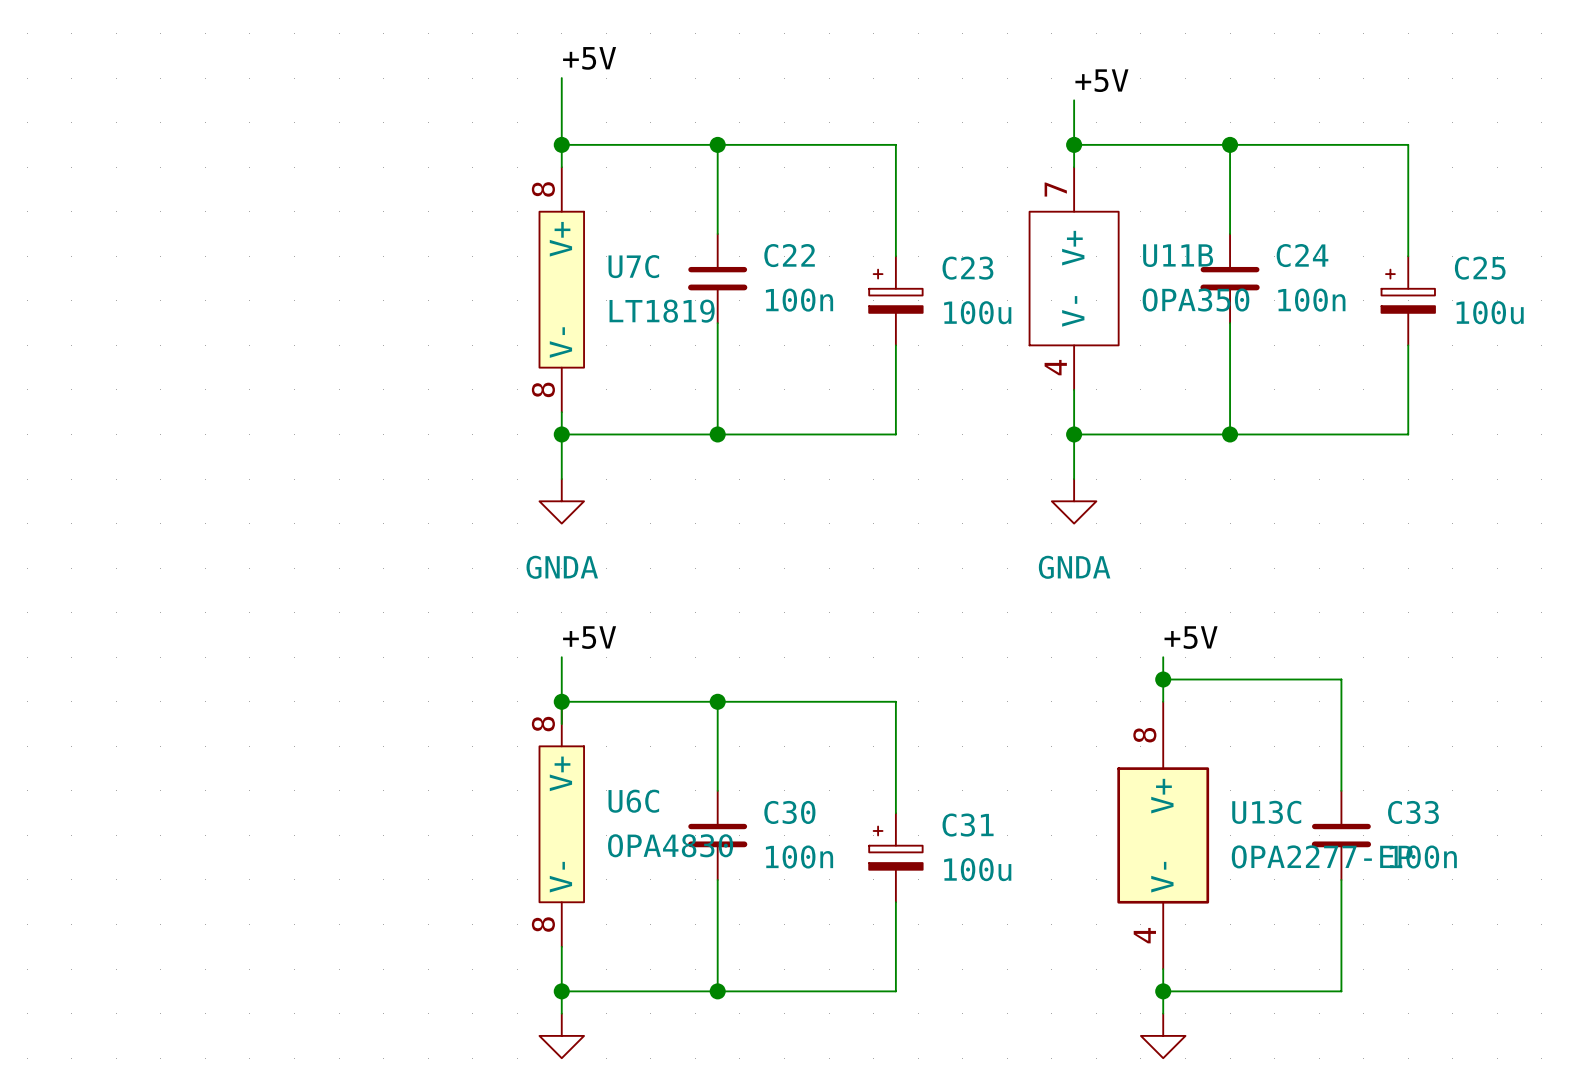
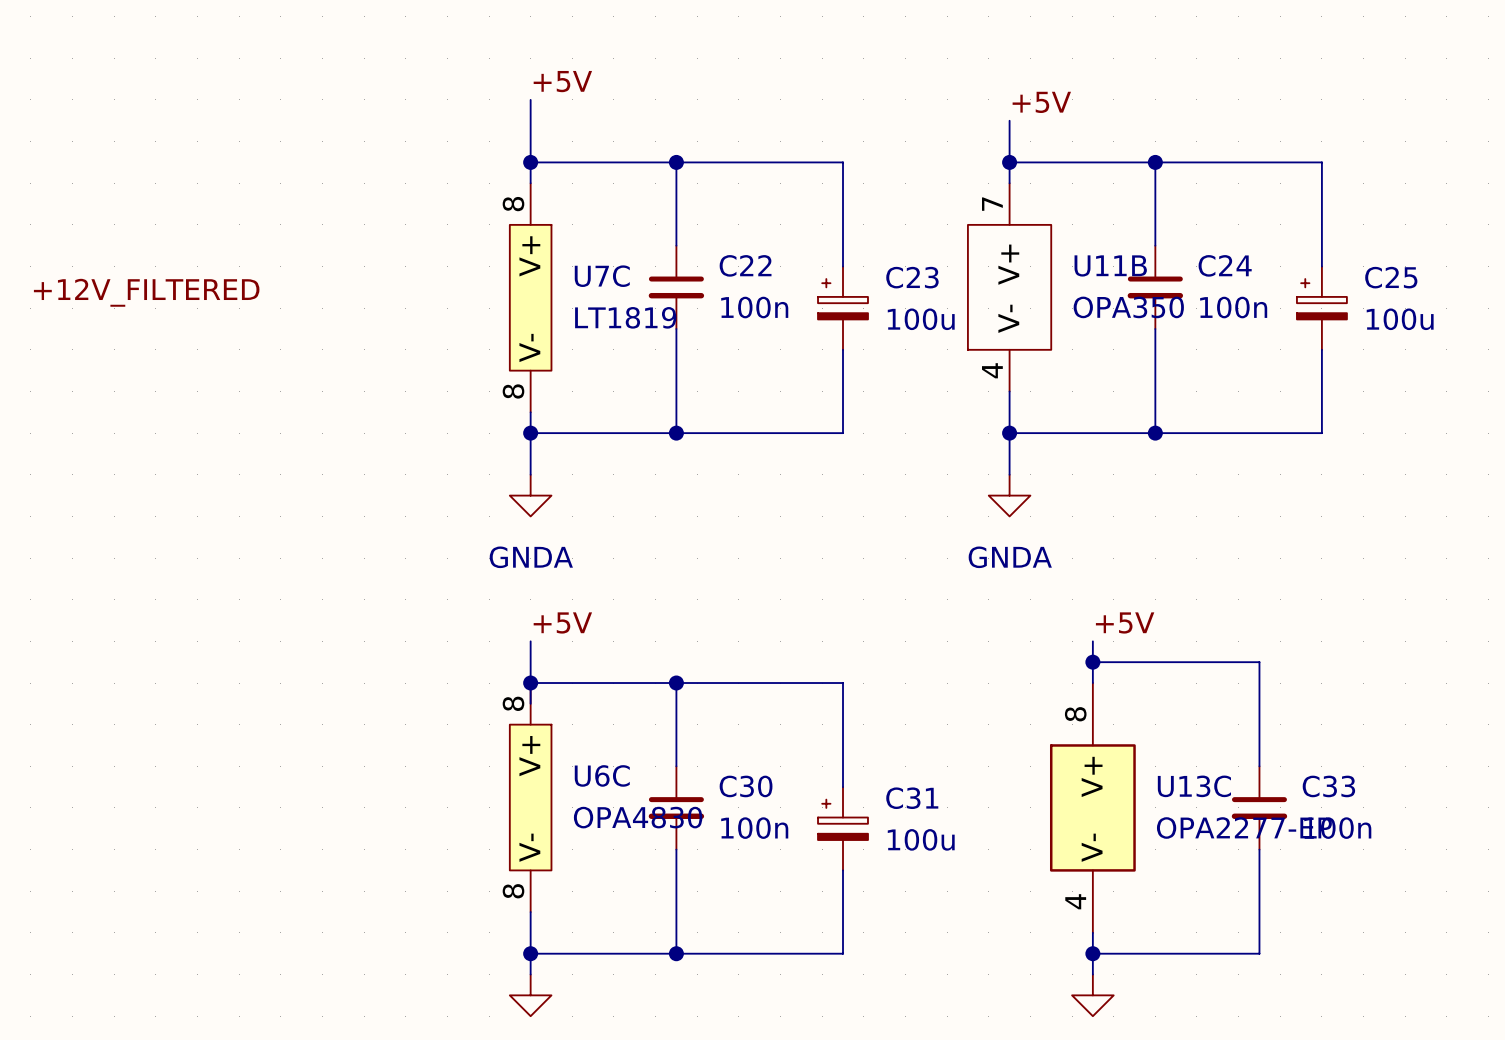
label: none -> +12V_FILTERED (146, 292)

